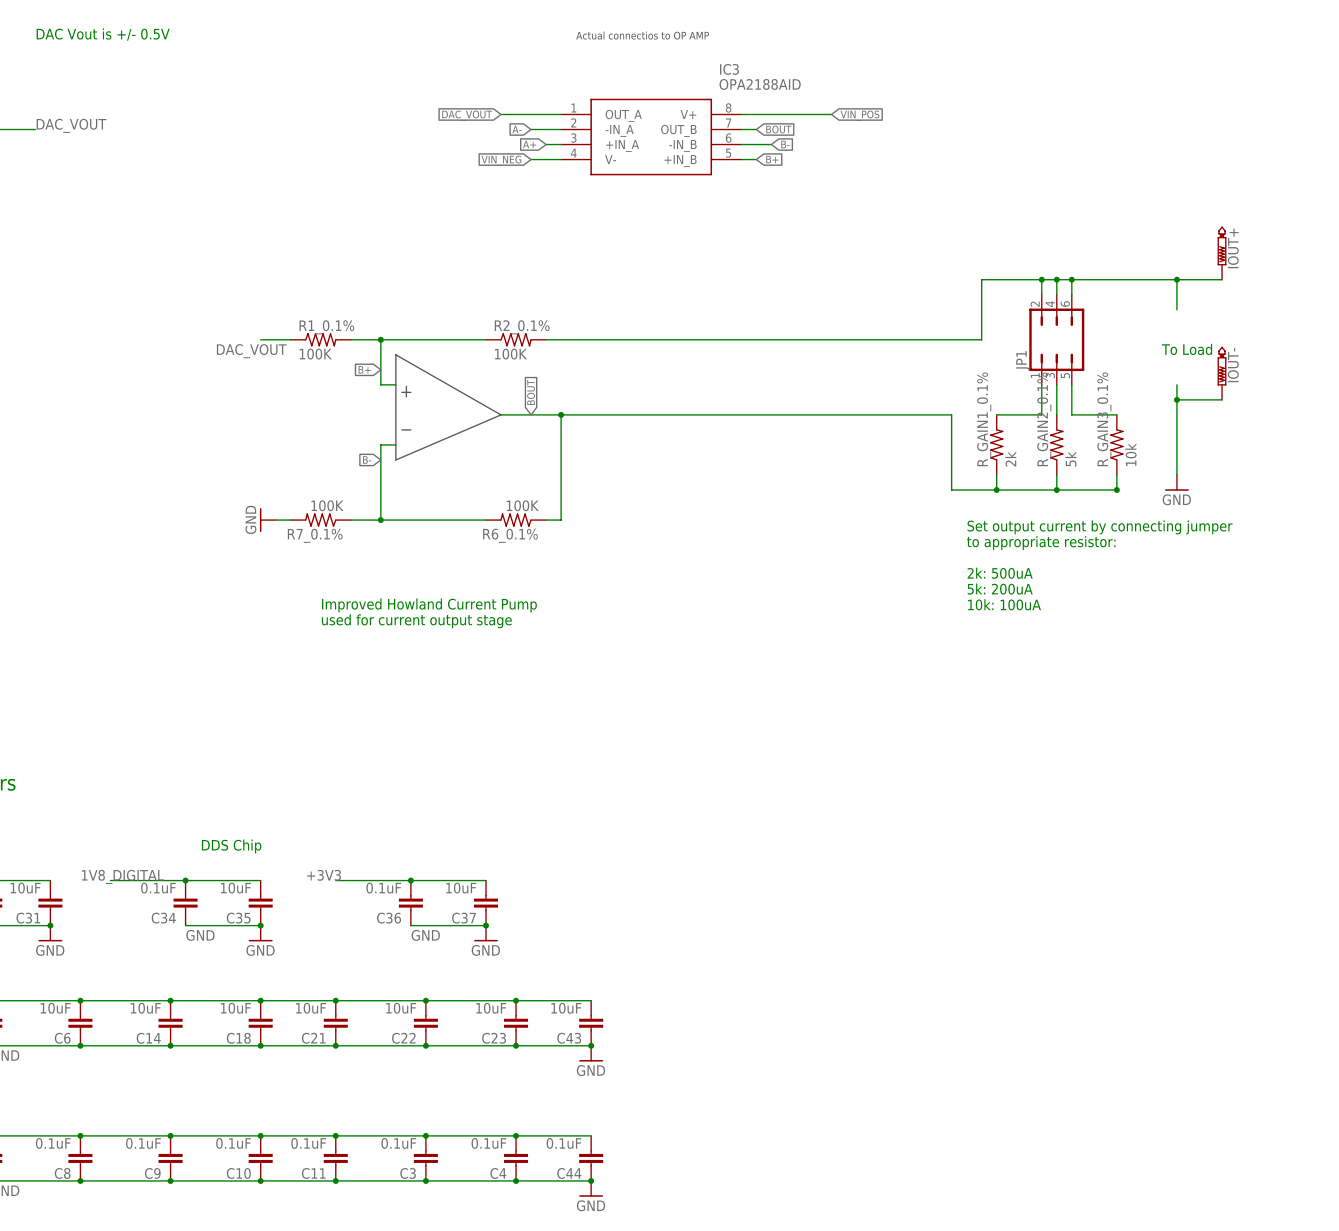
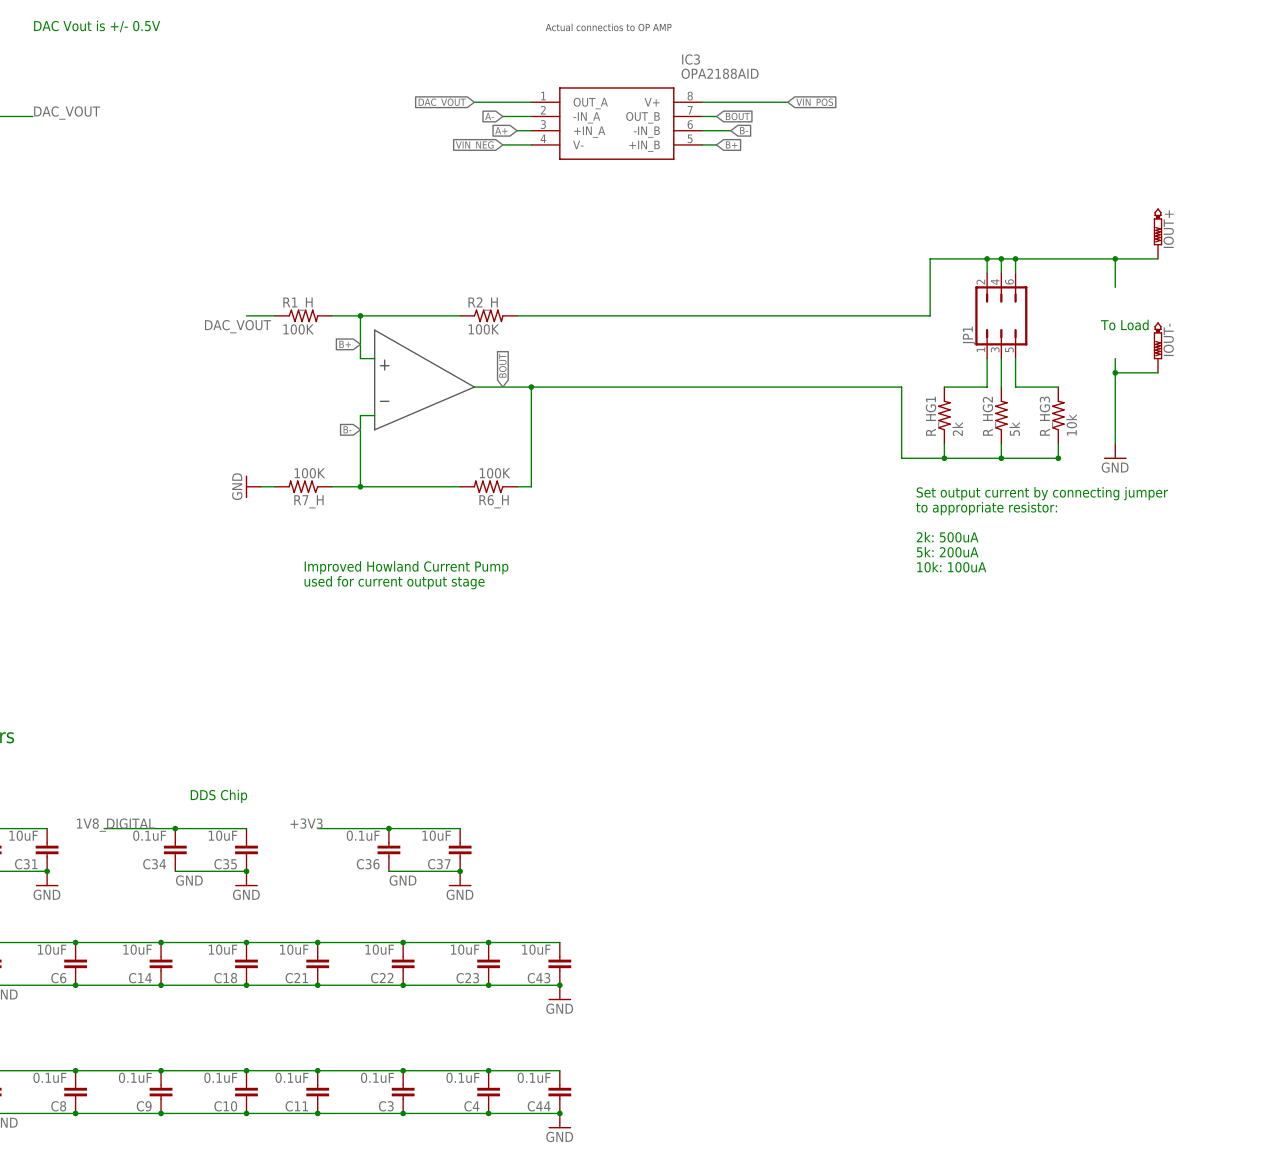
R1_0.1% name: R1_0.1% (326, 327) -> R1_H (298, 304)
R2_0.1% name: R2_0.1% (522, 327) -> R2_H (483, 304)
R_GAIN1_0.1% name: R_GAIN1_0.1% (984, 419) -> R_HG1 (932, 416)
R_GAIN2_0.1% name: R_GAIN2_0.1% (1044, 419) -> R_HG2 (989, 416)
R_GAIN3_0.1% name: R_GAIN3_0.1% (1104, 419) -> R_HG3 (1046, 416)
R7_0.1% name: R7_0.1% (315, 535) -> R7_H (308, 501)
R6_0.1% name: R6_0.1% (510, 535) -> R6_H (494, 501)

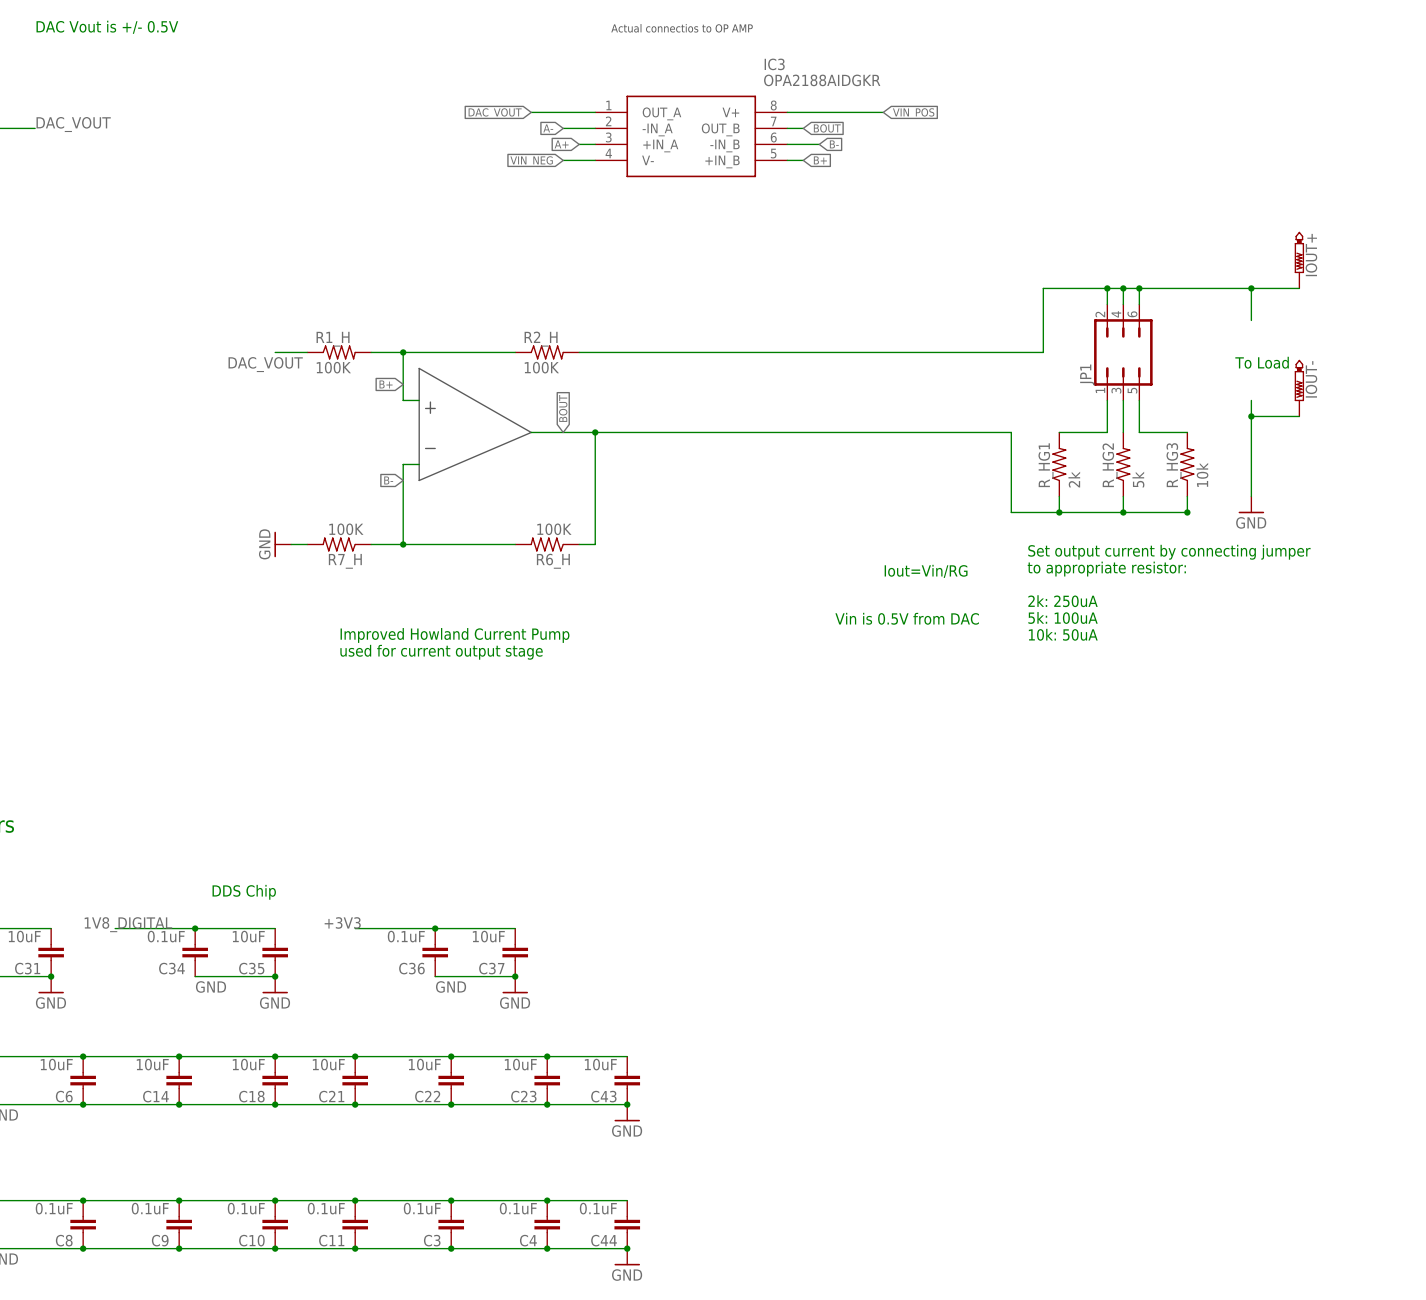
IC3 value: OPA2188AID (720, 73) -> OPA2188AIDGKR (822, 80)
text: none -> Iout=Vin/RG (926, 571)
text: 2k: 500uA (947, 537) -> 2k: 250uA (1063, 601)
text: none -> Vin is 0.5V from DAC (907, 618)
text: 5k: 200uA (947, 552) -> 5k: 100uA (1063, 617)
text: 10k: 100uA (951, 567) -> 10k: 50uA (1063, 634)

